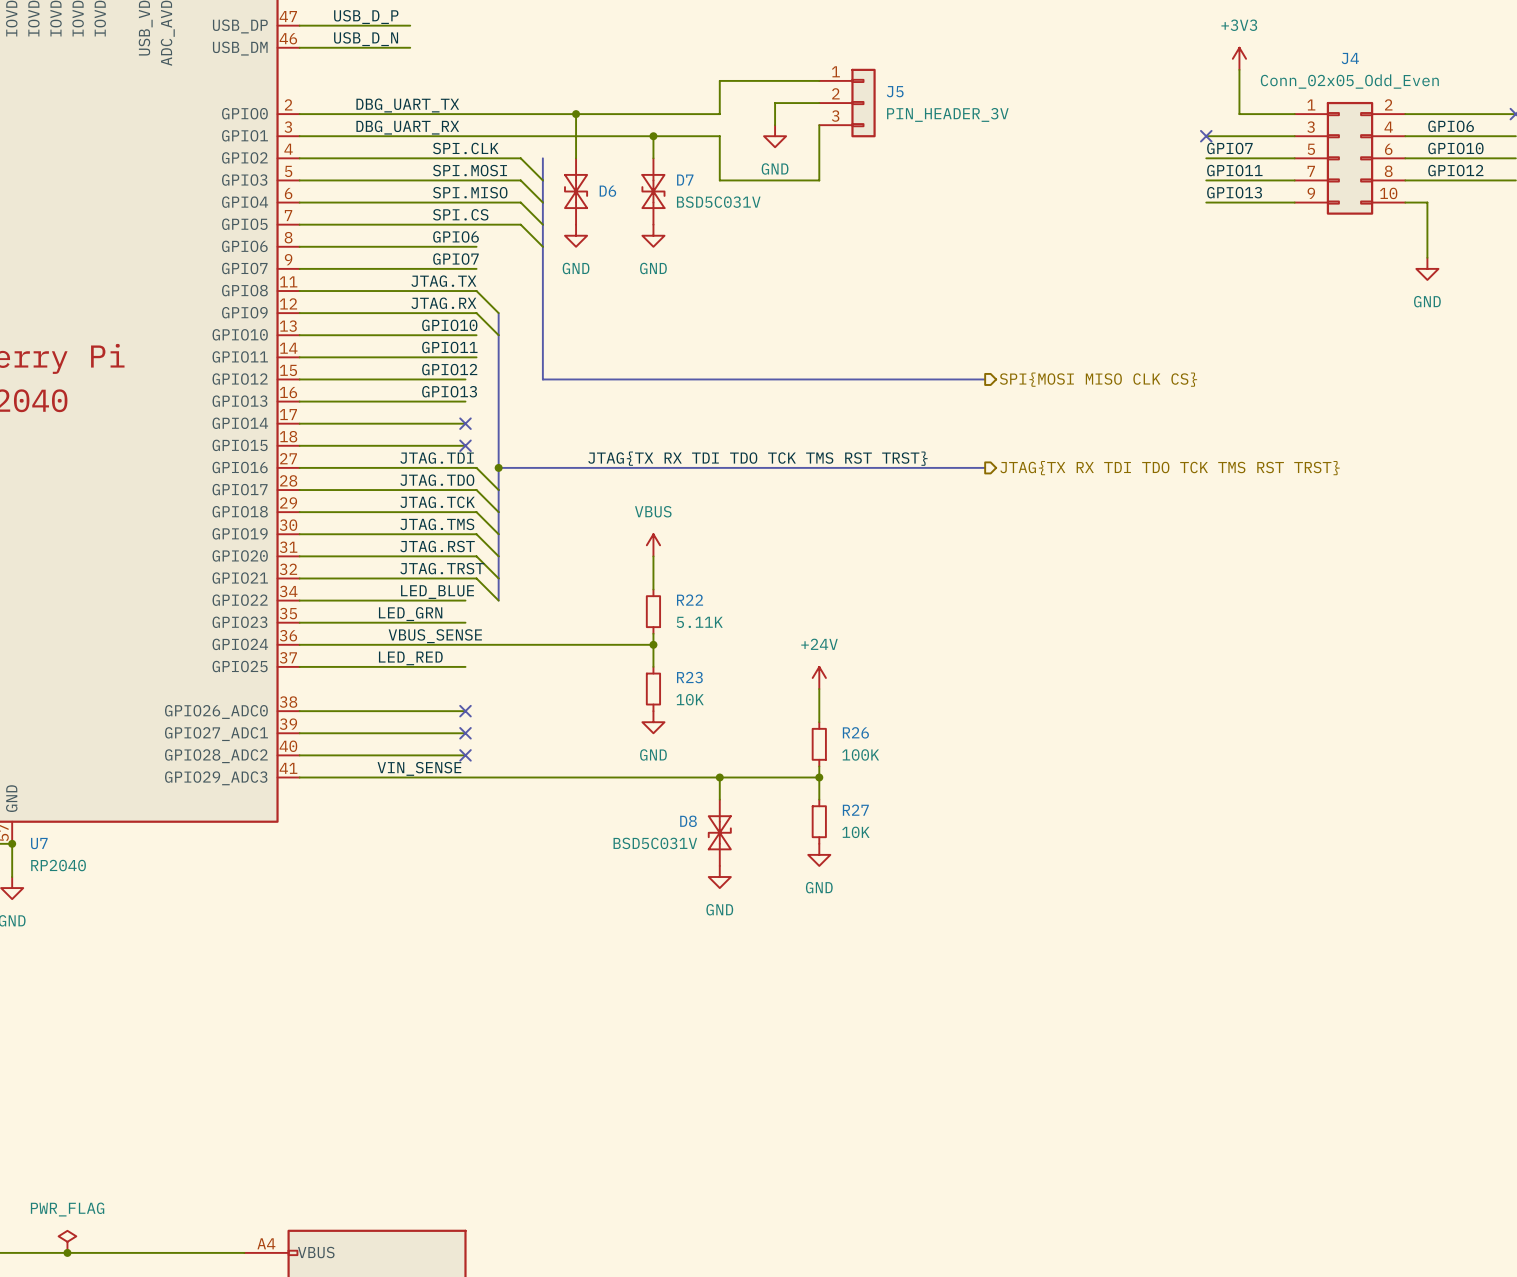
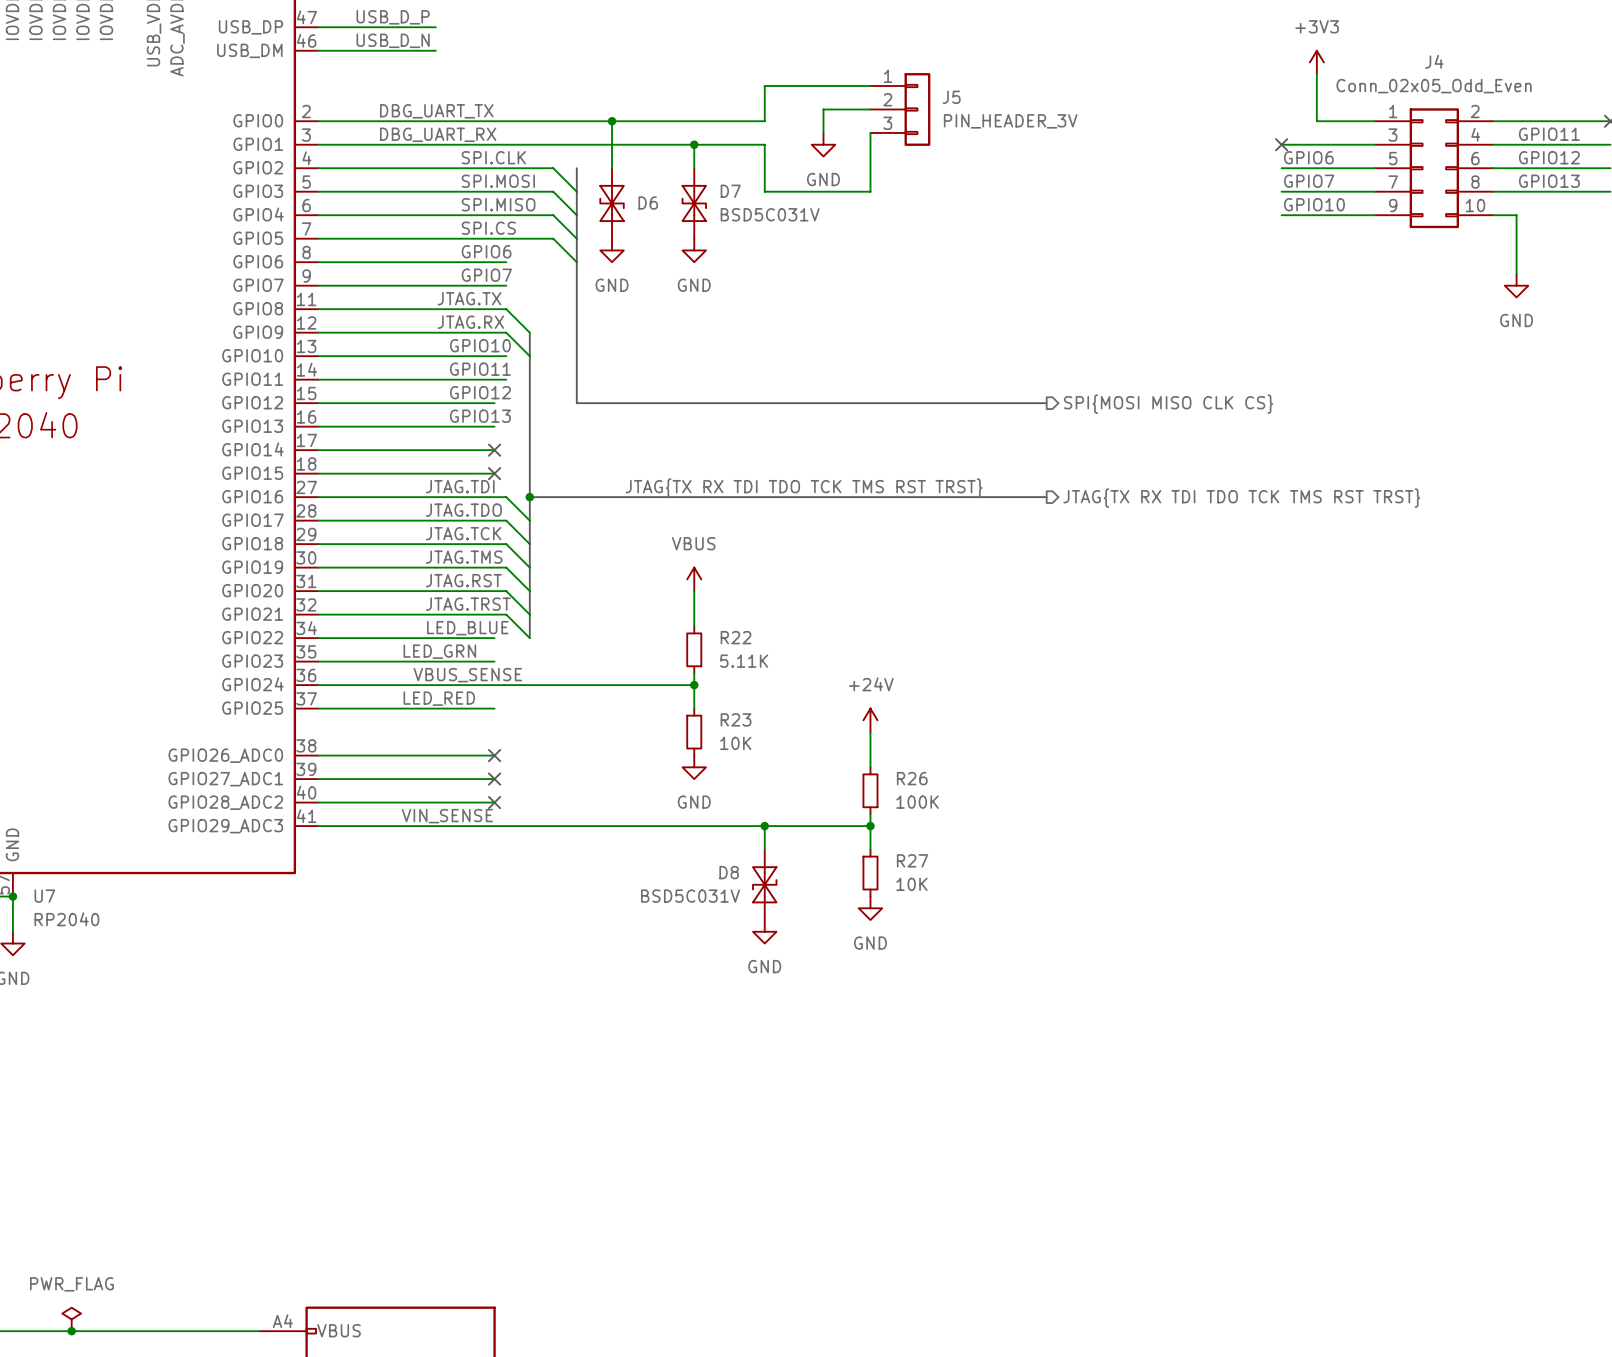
label: GPIO6 (1451, 126) -> GPIO11 (1549, 134)
label: GPIO7 (1229, 148) -> GPIO6 (1308, 157)
label: GPIO10 (1455, 148) -> GPIO12 (1549, 157)
label: GPIO11 (1234, 170) -> GPIO7 (1309, 181)
label: GPIO12 (1455, 170) -> GPIO13 (1549, 181)
label: GPIO13 (1234, 192) -> GPIO10 (1314, 204)

